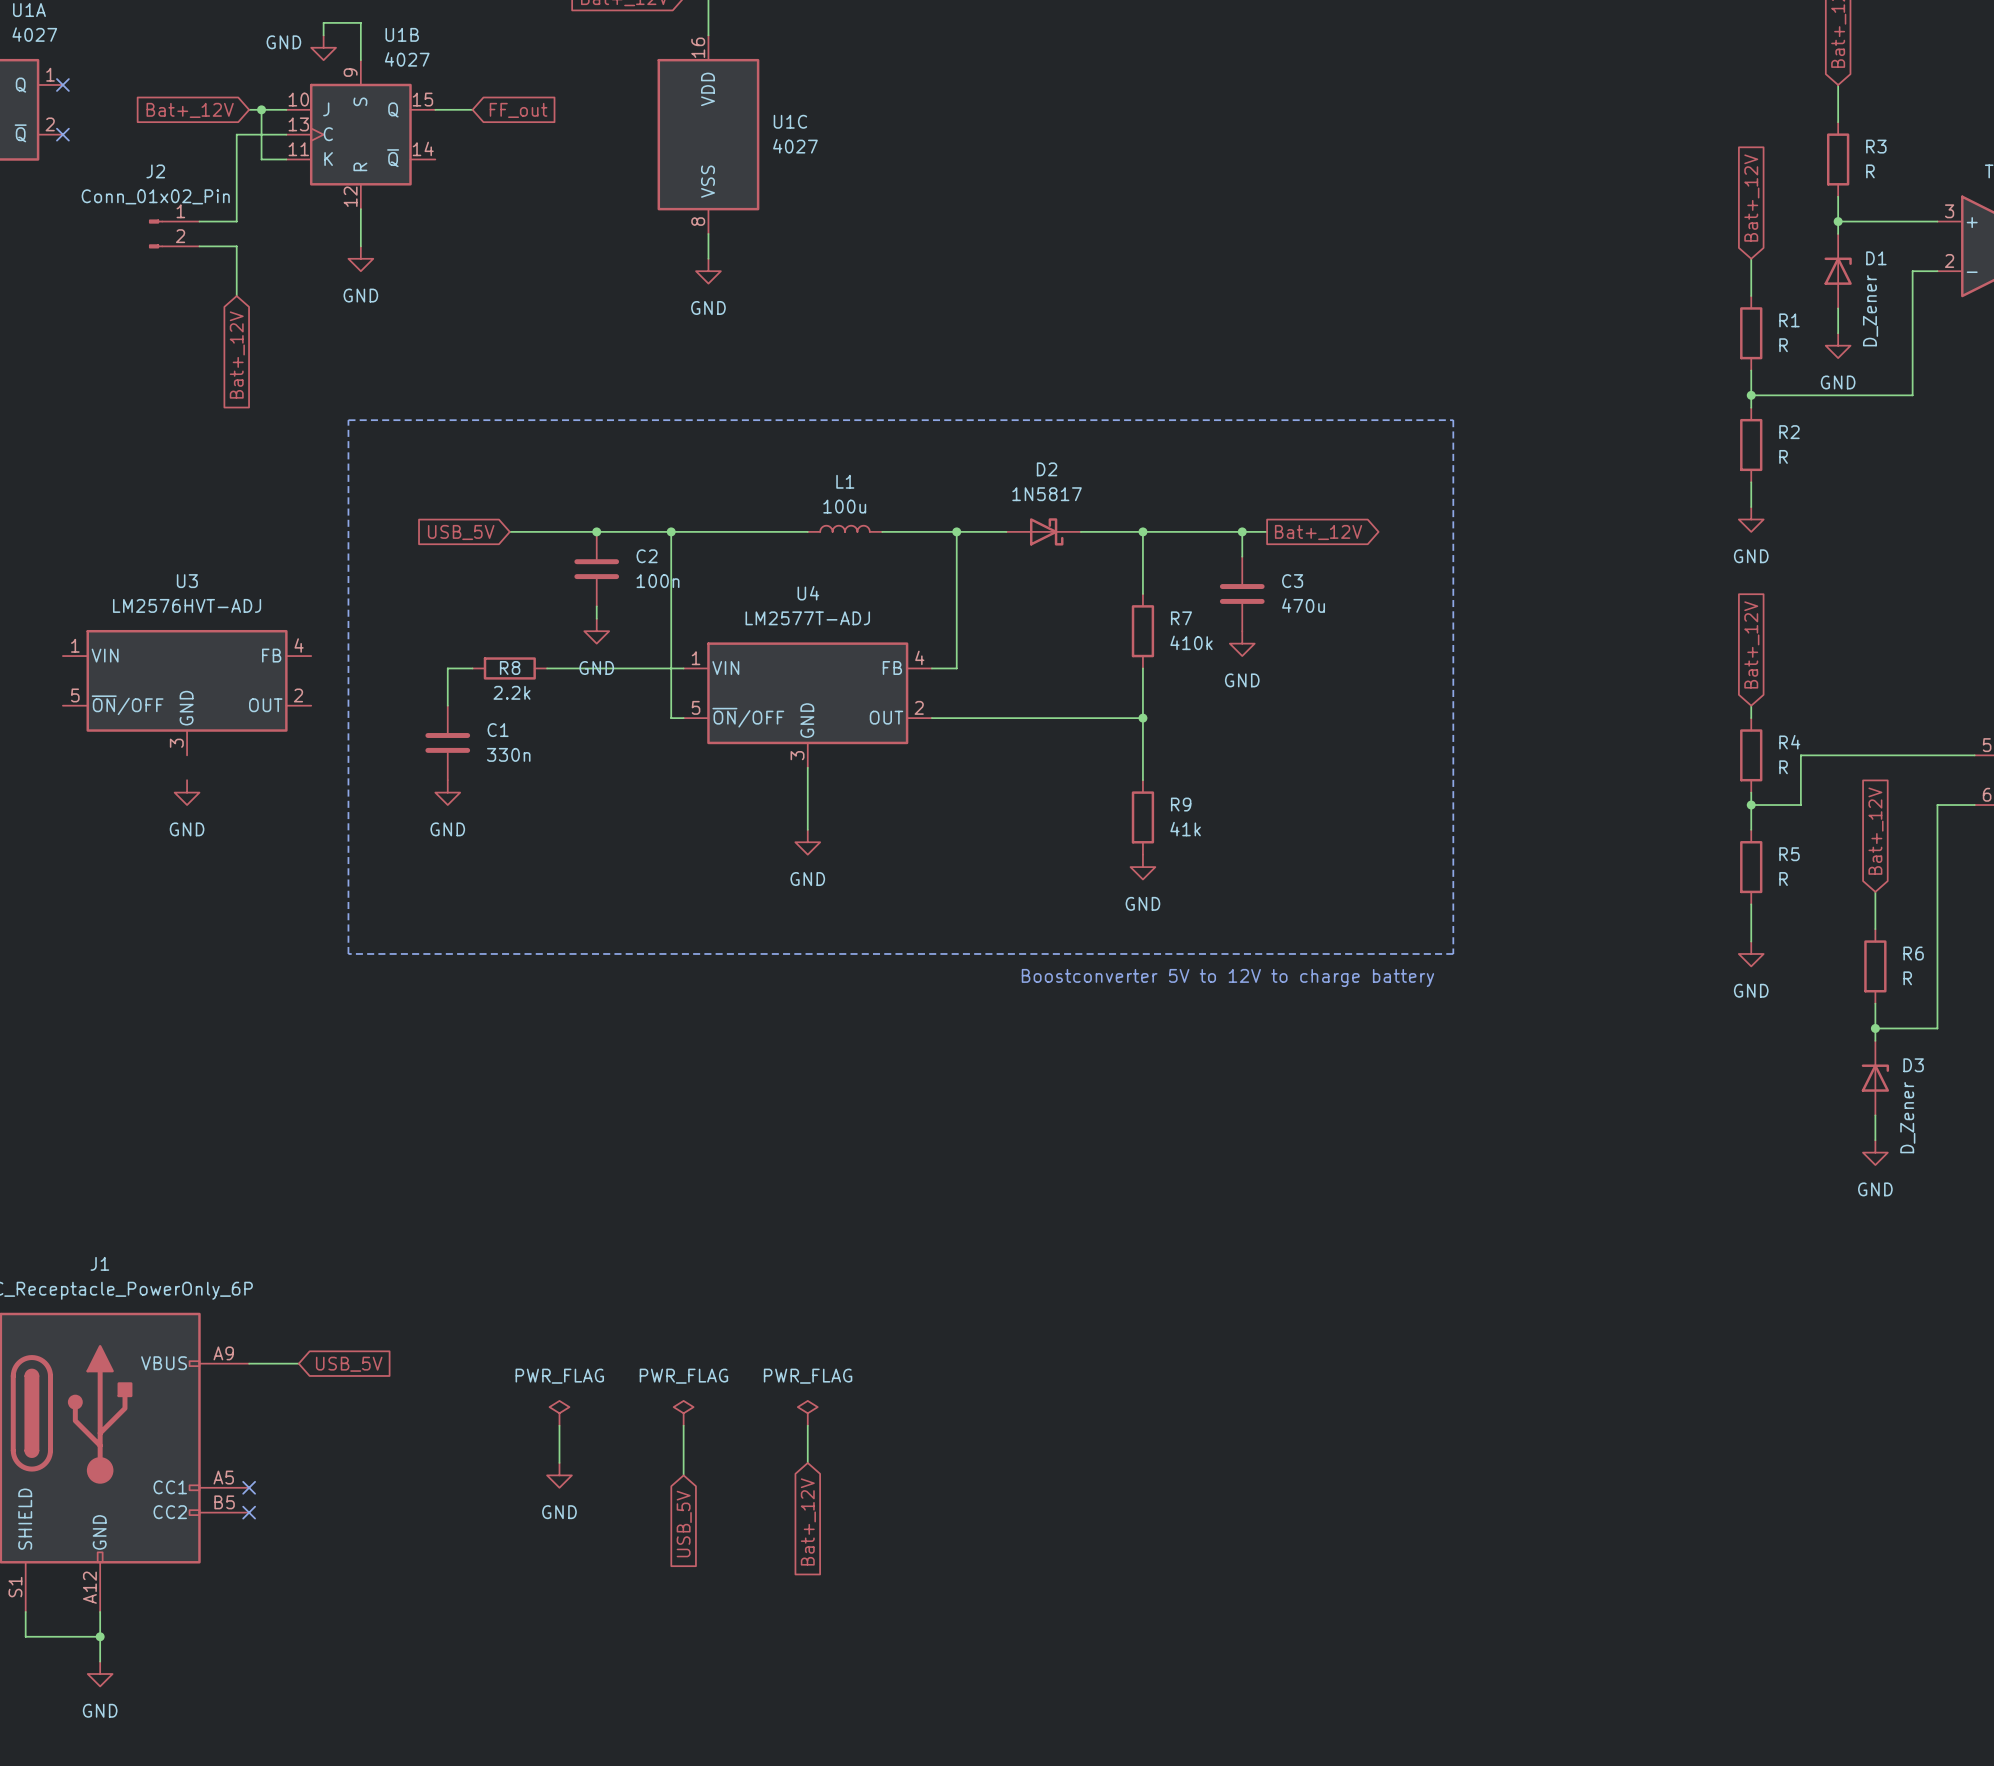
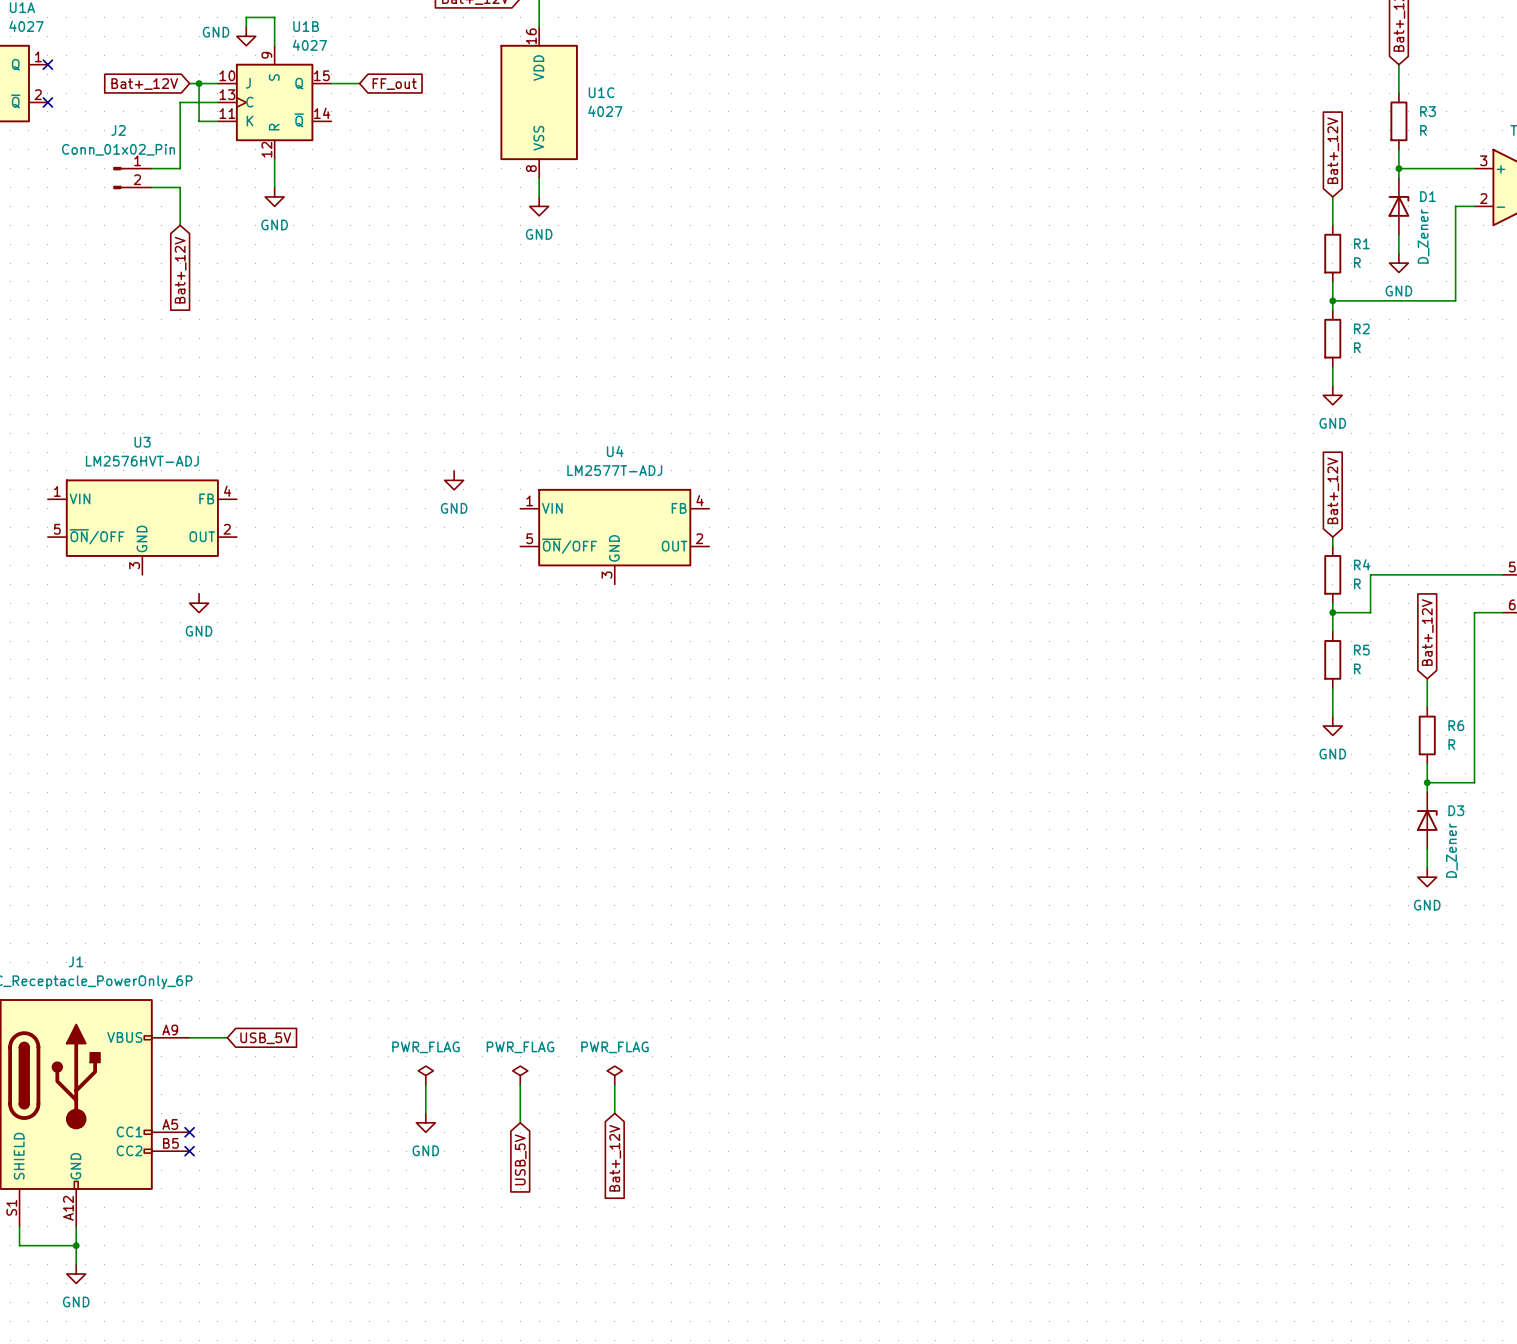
line: (348, 420) (1453, 420) (1453, 953) (348, 953) (348, 420) -> none
L1: 100u (845, 528) -> none
wire: (509, 531) (807, 531) -> none
junction: (596, 531) -> none
wire: (671, 531) (671, 718) (683, 718) -> none
junction: (671, 531) -> none
wire: (882, 531) (1006, 531) -> none
wire: (956, 531) (956, 668) (931, 668) -> none
junction: (956, 531) -> none
D2: 1N5817 (1043, 531) -> none
wire: (1080, 531) (1267, 531) -> none
wire: (1142, 531) (1142, 593) -> none
junction: (1142, 531) -> none
wire: (1242, 531) (1242, 556) -> none
junction: (1242, 531) -> none
global label: USB_5V (461, 532) -> none
global label: Bat+_12V (1318, 532) -> none
C2: 100n (596, 569) -> none
C3: 470u (1242, 593) -> none
wire: (596, 606) (596, 618) -> none
R7: 410k (1142, 631) -> none
power symbol: GND (1242, 643) -> none
wire: (472, 668) (447, 668) (447, 705) -> none
R8: 2.2k (509, 668) -> none
wire: (547, 668) (683, 668) -> none
wire: (1142, 668) (1142, 780) -> none
wire: (931, 718) (1142, 718) -> none
junction: (1142, 718) -> none
C1: 330n (447, 742) -> none
wire: (807, 767) (807, 829) -> none
power symbol position: GND (187, 792) -> GND (199, 603)
power symbol: GND (447, 792) -> none
R9: 41k (1142, 817) -> none
power symbol: GND (807, 842) -> none
power symbol: GND (1142, 867) -> none
text: Boostconverter 5V to 12V to charge battery (1227, 977) -> none

